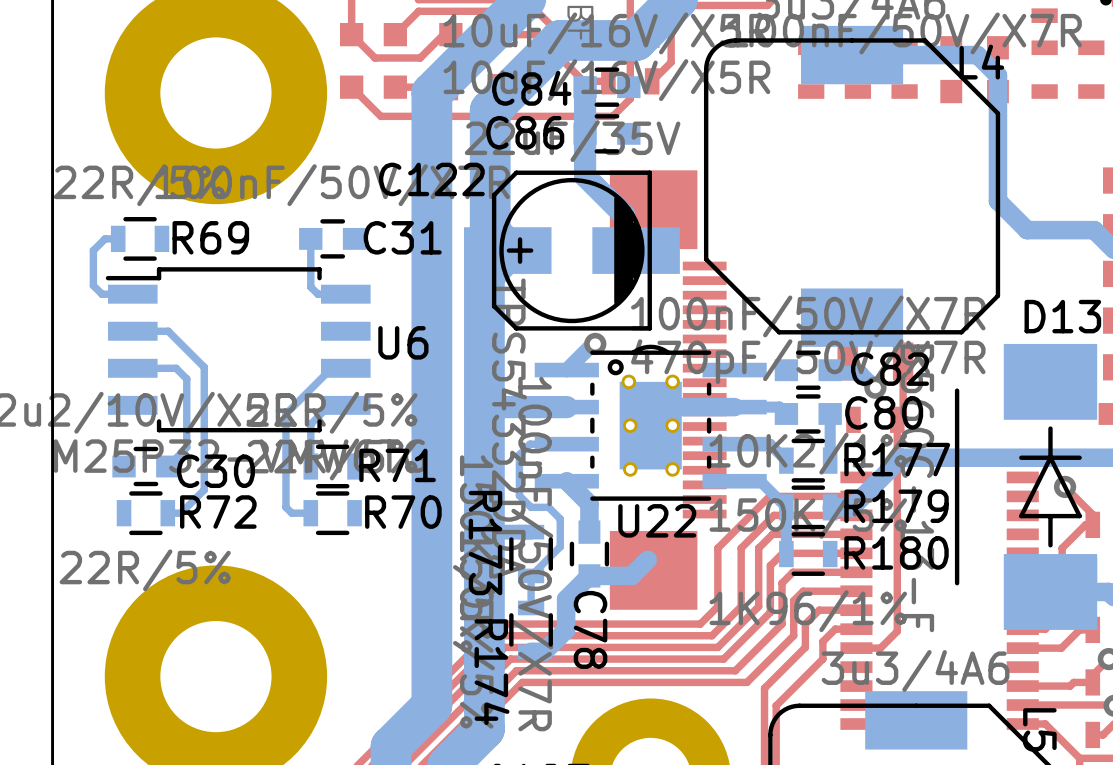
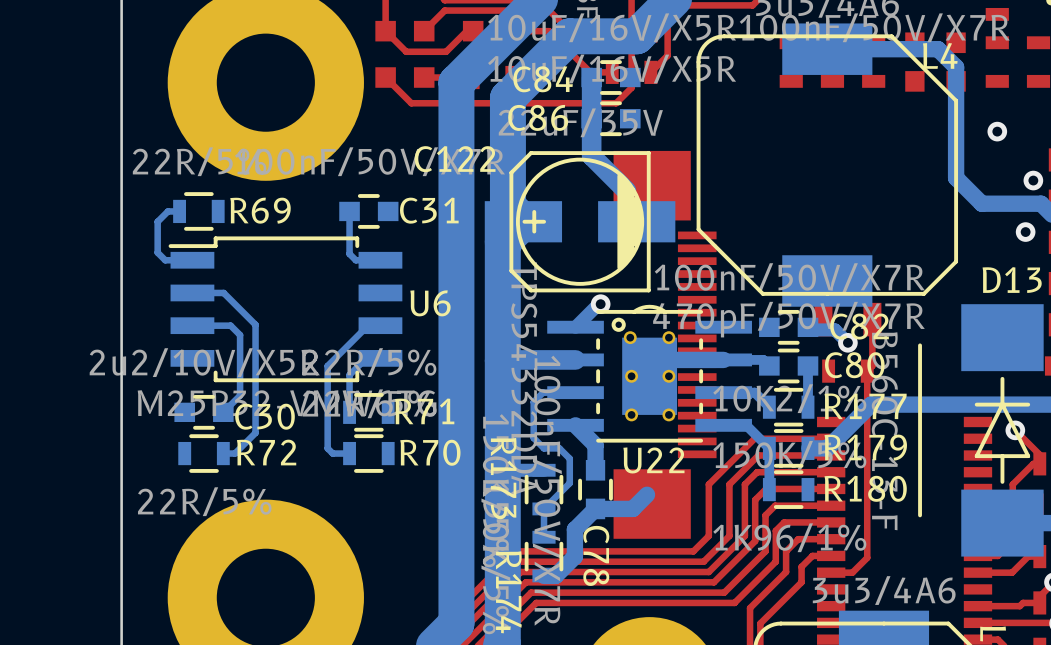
via: none -> (997, 131)
via: none -> (1033, 180)
via: none -> (1025, 232)

